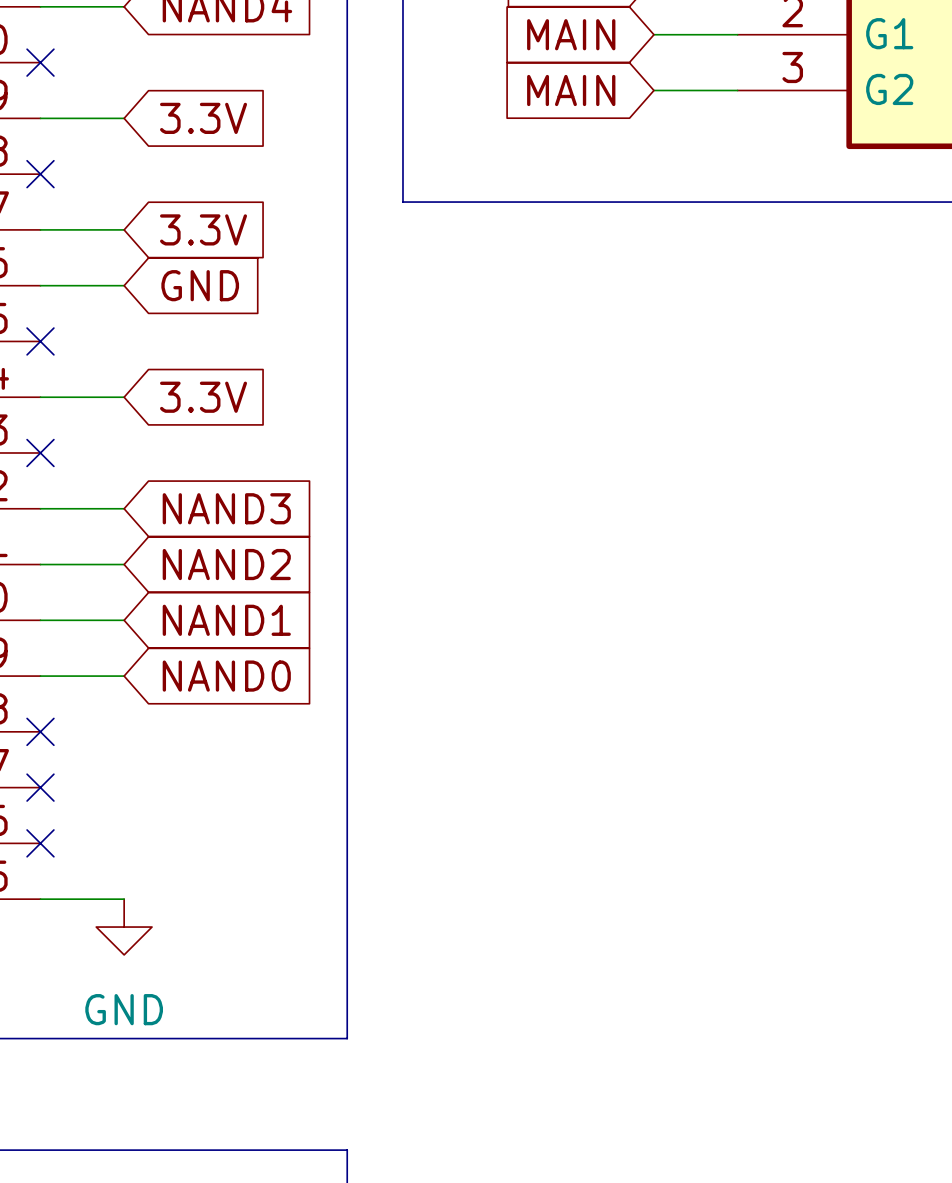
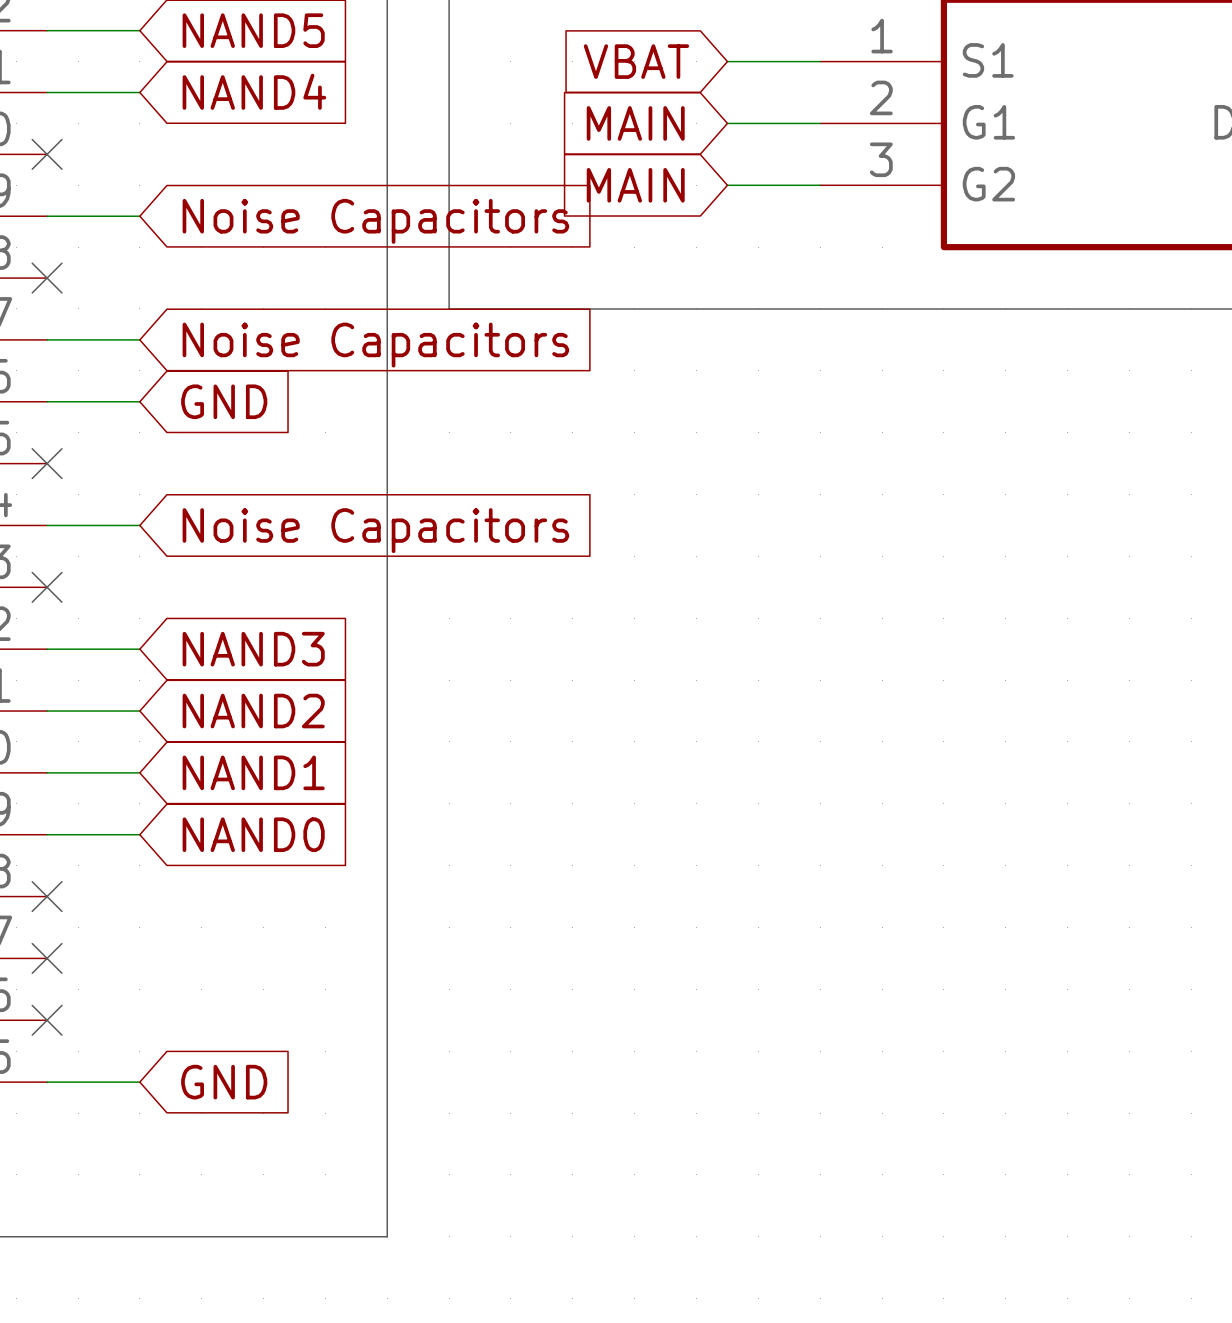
global label: 3.3V (203, 118) -> Noise Capacitors (375, 221)
global label: 3.3V (203, 229) -> Noise Capacitors (375, 345)
global label: 3.3V (203, 397) -> Noise Capacitors (375, 530)
global label: none -> GND (224, 1082)
power symbol: GND (124, 927) -> none

